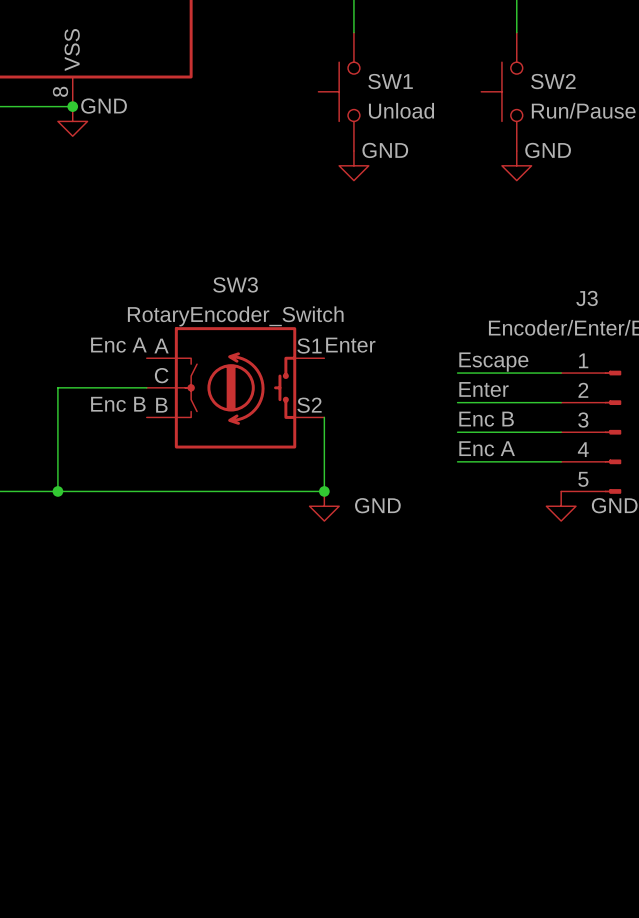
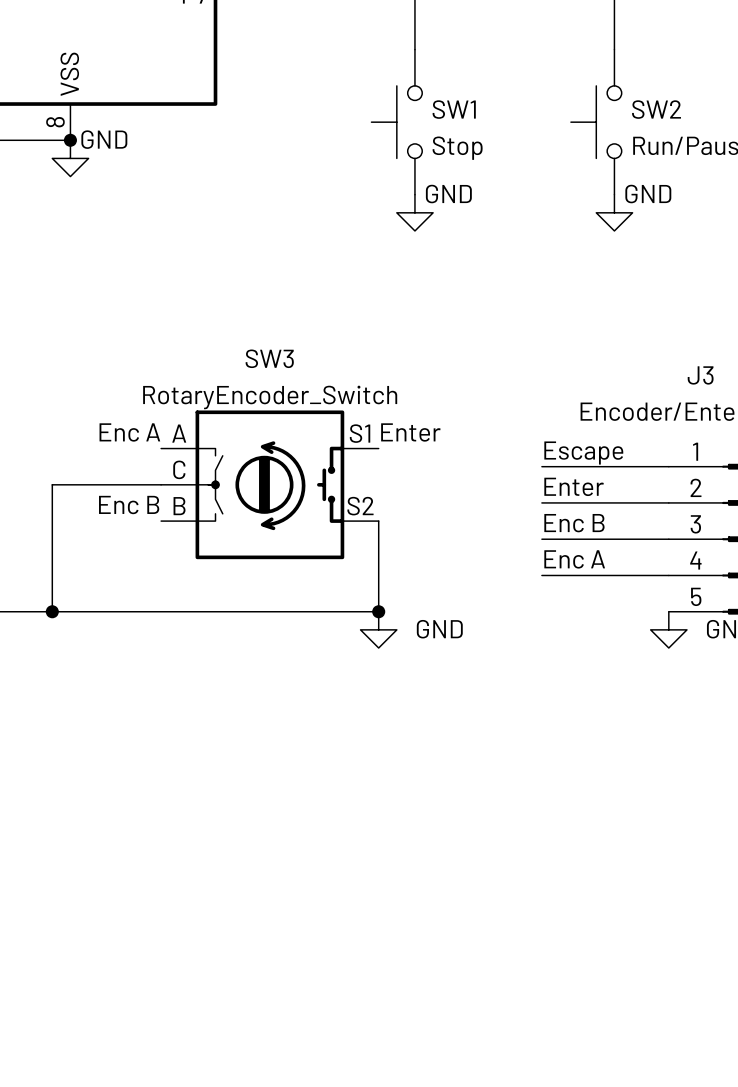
SW1 value: Unload (401, 110) -> Stop (457, 148)

